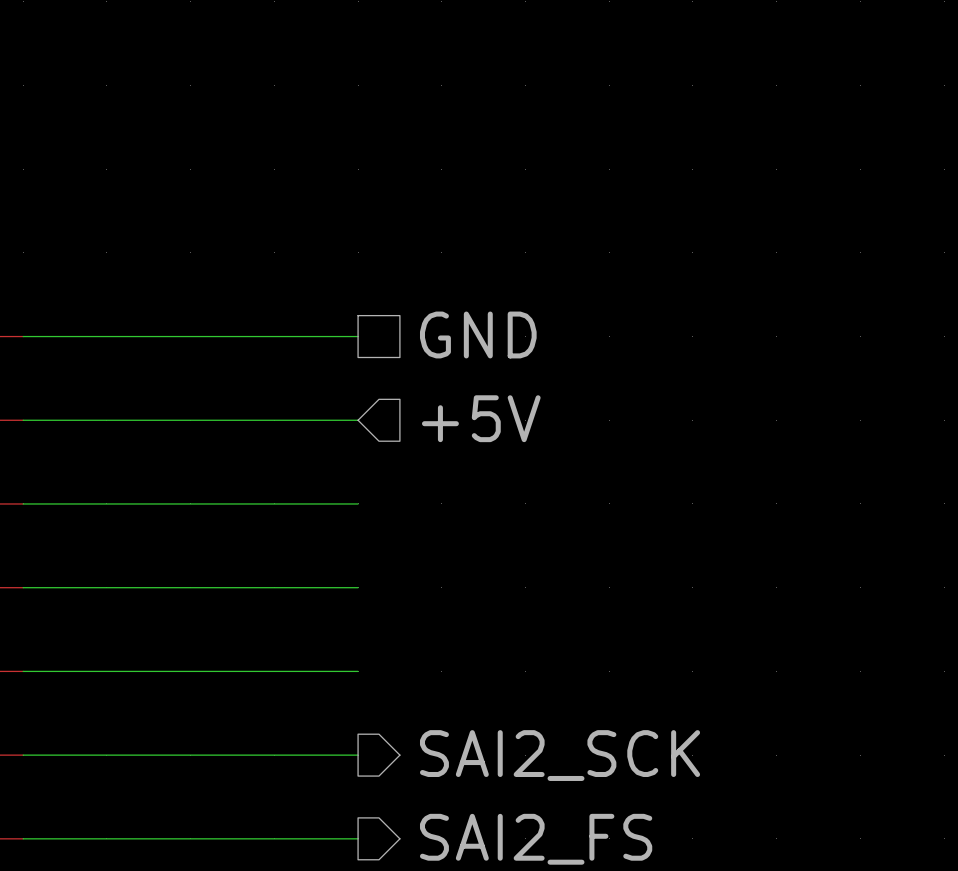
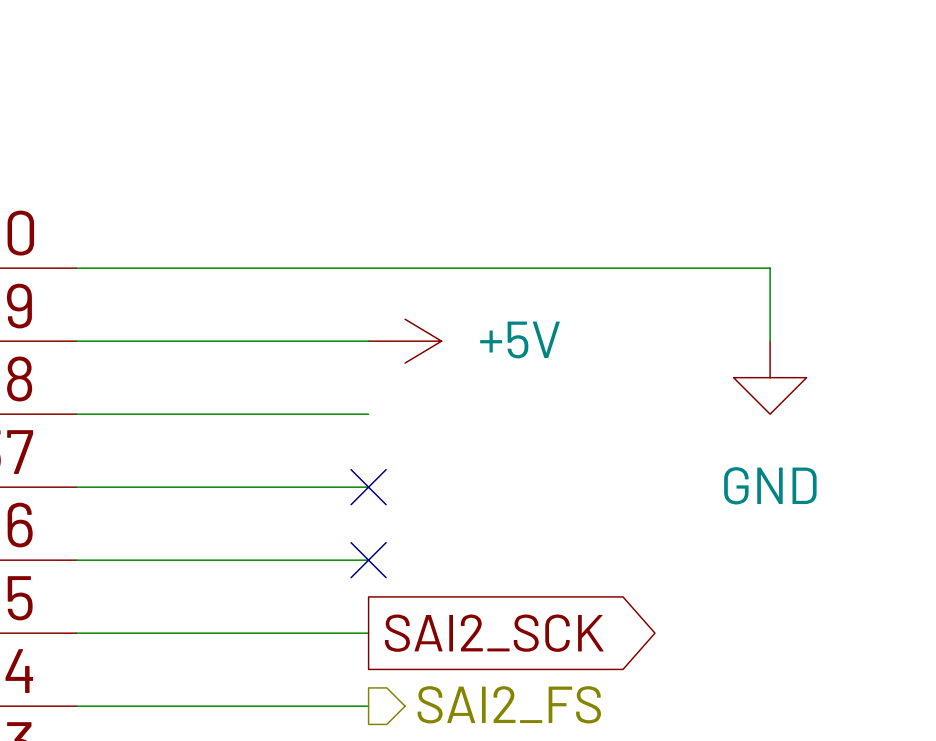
hierarchical label: GND (478, 334) -> none
wire: none -> (368, 268) (770, 268) (770, 341)
hierarchical label: +5V (481, 418) -> none
power symbol: none -> +5V (405, 341)
power symbol: none -> GND (770, 377)
no-connect mark: none -> (368, 487)
no-connect mark: none -> (368, 560)
hierarchical label: SAI2_SCK (560, 755) -> none
global label: none -> SAI2_SCK (494, 633)

